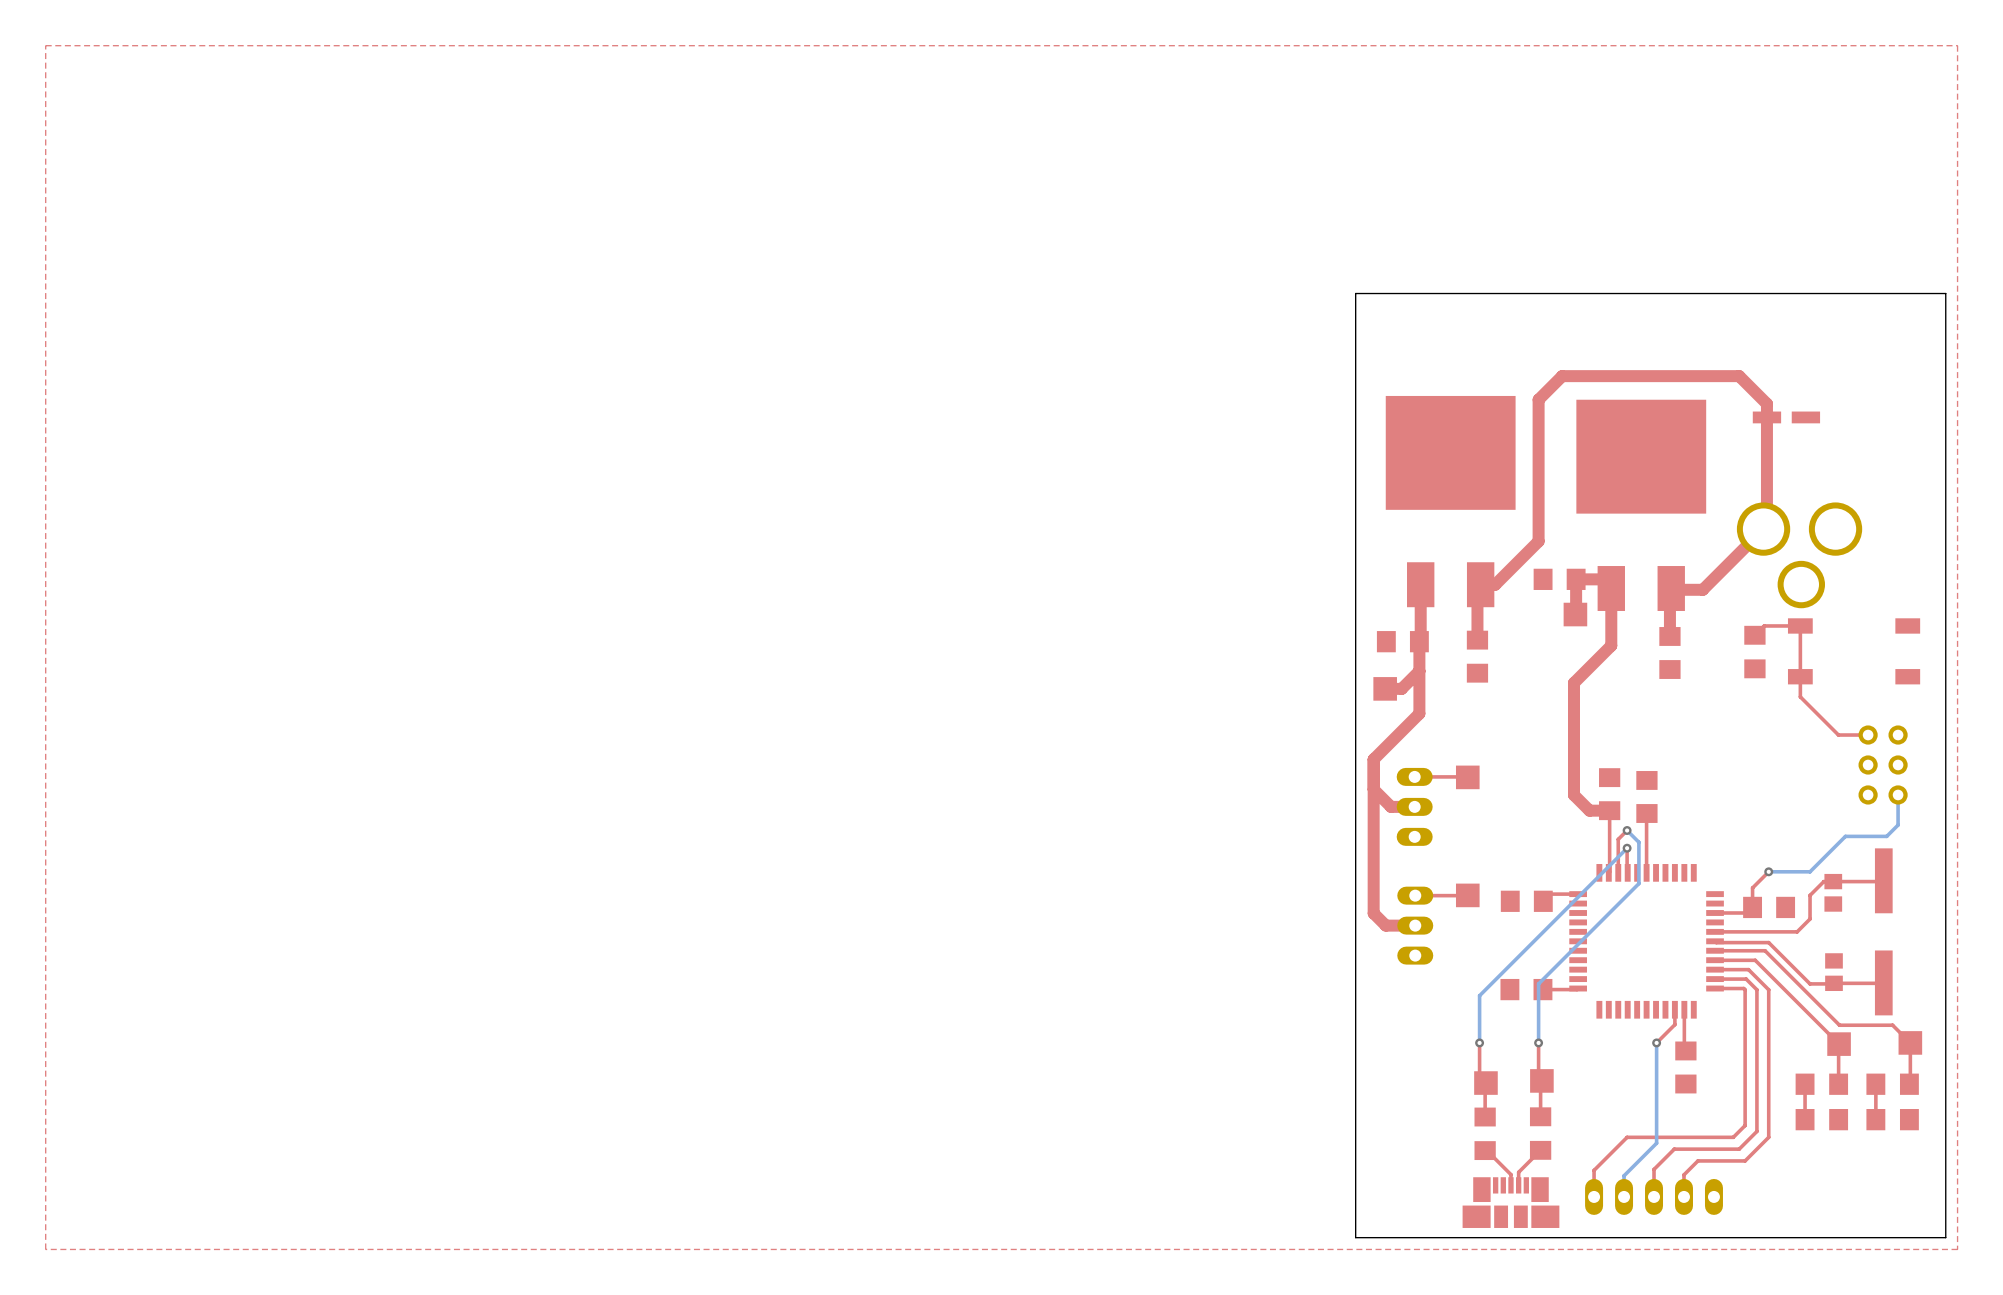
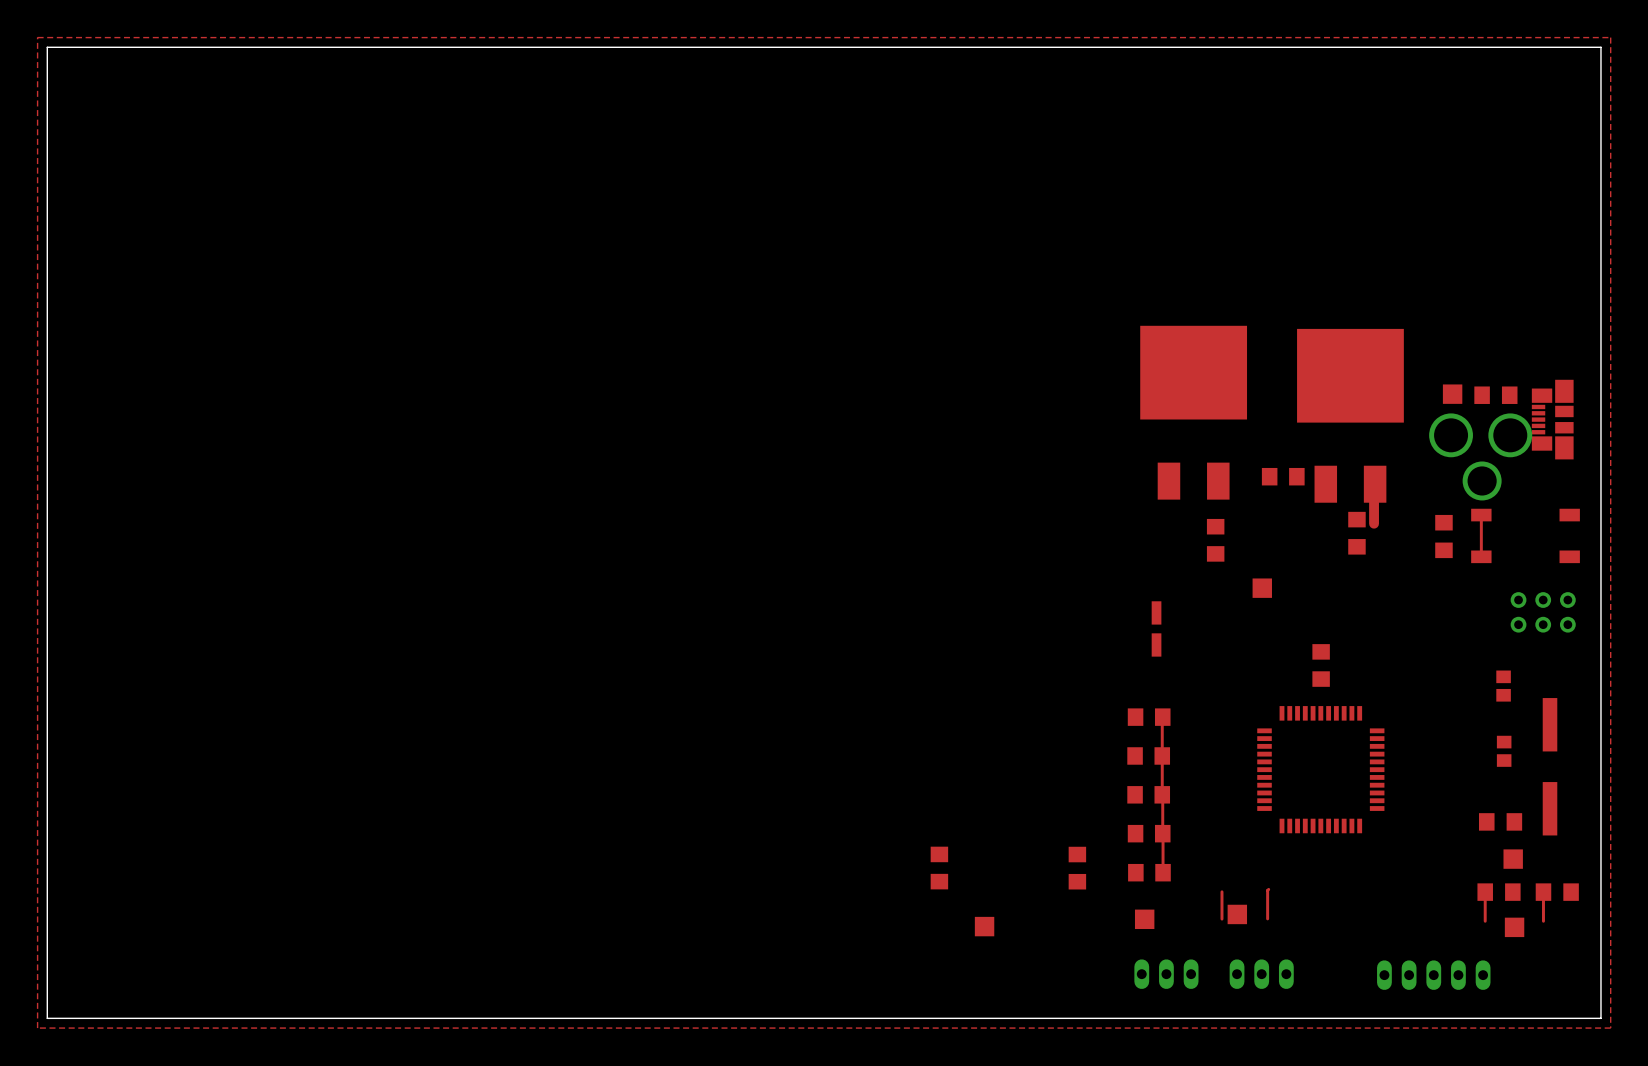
board edge: (1945, 293) (1355, 293) (1355, 1237) -> (1600, 241) (1600, 47) (47, 47) (47, 1018) (1115, 1018)
part: (1786, 417) -> none
part: none -> (1452, 394)
part: none -> (1495, 395)
part: none -> (1552, 419)
top track: (1420, 584) (1419, 713) (1373, 759) (1373, 913) (1385, 925) (1415, 925) -> none
top track: (1671, 588) (1669, 589) (1702, 589) (1766, 525) (1766, 403) (1739, 376) (1562, 376) (1538, 399) (1538, 541) (1495, 584) (1480, 584) (1479, 576) (1477, 578) (1477, 640) -> none
top track: (1575, 614) (1576, 579) (1602, 579) (1611, 588) (1611, 645) (1574, 682) (1574, 795) (1589, 810) (1609, 810) (1608, 872) -> none
part: (1575, 614) -> none
top track: (1800, 625) (1764, 625) (1754, 635) -> none
part: (1402, 641) -> none
part position: (1669, 653) -> (1356, 533)
top track: (1419, 671) (1401, 688) (1385, 688) -> none
top track: (1800, 676) (1800, 696) (1838, 735) (1868, 735) -> none
part: (1385, 688) -> none
part: none -> (1262, 588)
part: none -> (1156, 628)
part rotation: 0° (1883, 765) -> 90° clockwise (1543, 612)
top track: (1414, 776) (1467, 777) -> none
part: (1467, 777) -> none
top track: (1373, 789) (1391, 806) (1414, 806) -> none
part position: (1609, 794) -> (1321, 665)
bottom track: (1898, 794) (1898, 825) (1886, 836) (1845, 836) (1810, 871) (1768, 871) -> none
part: (1646, 796) -> none
part: (1414, 806) -> none
top track: (1646, 813) (1646, 872) -> none
top track: (1627, 830) (1618, 839) (1618, 872) -> none
bottom track: (1627, 830) (1638, 842) (1638, 883) (1538, 983) (1538, 1042) -> none
via: (1627, 830) -> none
part: none -> (1503, 686)
top track: (1627, 848) (1627, 872) -> none
bottom track: (1627, 848) (1479, 995) (1479, 1042) -> none
via: (1627, 848) -> none
part: none -> (1149, 717)
top track: none -> (1162, 717) (1162, 794)
top track: (1768, 871) (1752, 887) (1752, 907) (1747, 912) (1715, 912) -> none
via: (1768, 871) -> none
top track: (1883, 880) (1823, 881) (1810, 895) (1810, 919) (1797, 931) (1715, 931) -> none
part position: (1833, 892) -> (1504, 751)
top track: (1578, 894) (1550, 894) (1543, 901) -> none
top track: (1467, 895) (1415, 895) -> none
part: (1467, 895) -> none
part: (1526, 901) -> none
part: (1769, 907) -> none
part: none -> (1148, 755)
part: (1415, 925) -> none
part position: (1646, 941) -> (1320, 769)
top track: (1715, 941) (1768, 942) (1810, 983) (1883, 982) -> none
top track: (1715, 950) (1765, 950) (1839, 1025) (1892, 1025) (1910, 1042) (1909, 1084) -> none
top track: (1715, 960) (1755, 960) (1839, 1044) (1838, 1084) -> none
part: none -> (1148, 794)
top track: none -> (1162, 794) (1162, 833)
top track: (1715, 969) (1748, 969) (1768, 989) (1768, 1137) (1745, 1160) (1697, 1160) (1683, 1174) (1683, 1196) -> none
part: (1833, 972) -> none
top track: (1715, 979) (1746, 979) (1756, 989) (1756, 1131) (1739, 1149) (1674, 1149) (1654, 1169) (1654, 1196) -> none
top track: (1578, 988) (1542, 989) -> none
top track: (1715, 988) (1745, 989) (1745, 1125) (1733, 1137) (1627, 1137) (1594, 1170) (1594, 1196) -> none
part: (1526, 989) -> none
part: none -> (1500, 821)
top track: none -> (1159, 830) (1163, 833) (1163, 872)
top track: (1674, 1009) (1674, 1024) (1656, 1042) -> none
top track: (1684, 1009) (1685, 1050) -> none
part: none -> (1149, 833)
top track: (1479, 1042) (1479, 1078) (1485, 1083) -> none
via: (1479, 1042) -> none
top track: (1538, 1042) (1538, 1082) (1540, 1084) -> none
via: (1538, 1042) -> none
bottom track: (1656, 1042) (1656, 1143) (1624, 1175) (1624, 1196) -> none
via: (1656, 1042) -> none
part position: (1910, 1042) -> (1514, 927)
part: none -> (939, 868)
part: none -> (1077, 868)
part: none -> (1149, 872)
part: (1685, 1067) -> none
part: (1541, 1080) -> none
part: (1485, 1083) -> none
part: none -> (1237, 914)
part: none -> (1144, 919)
part: (1821, 1119) -> none
part: (1892, 1119) -> none
part: none -> (984, 926)
part: (1485, 1133) -> none
part: (1540, 1133) -> none
top track: (1485, 1150) (1510, 1174) (1510, 1185) -> none
top track: (1540, 1150) (1518, 1172) (1518, 1185) -> none
part: none -> (1166, 974)
part: none -> (1261, 974)
part position: (1654, 1196) -> (1433, 975)
part: (1510, 1202) -> none

